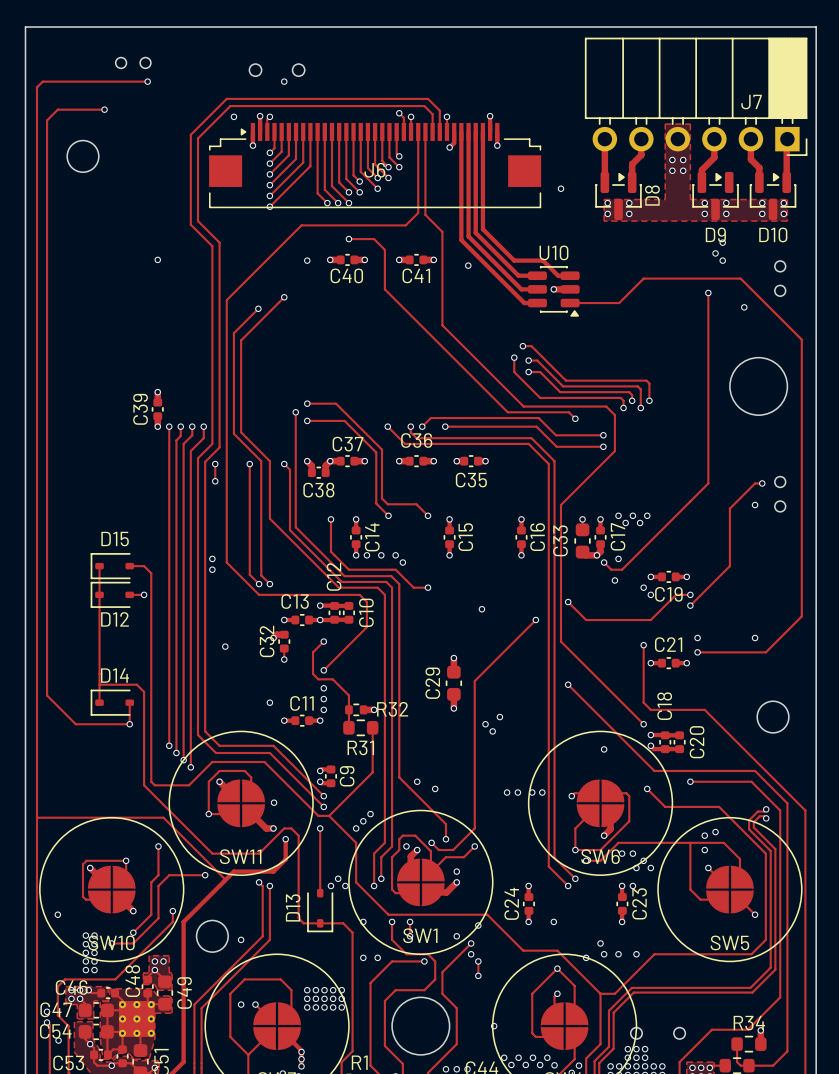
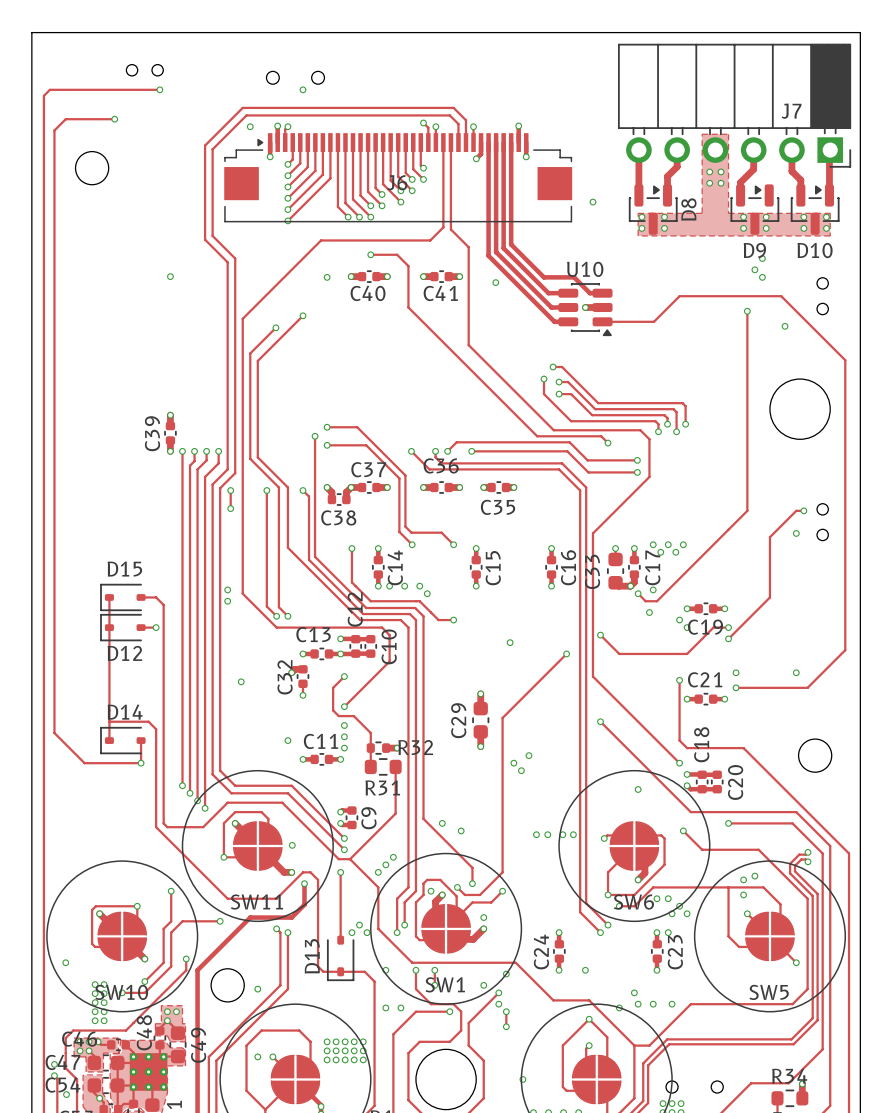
track: (36, 817) (163, 817) (225, 879) -> none

